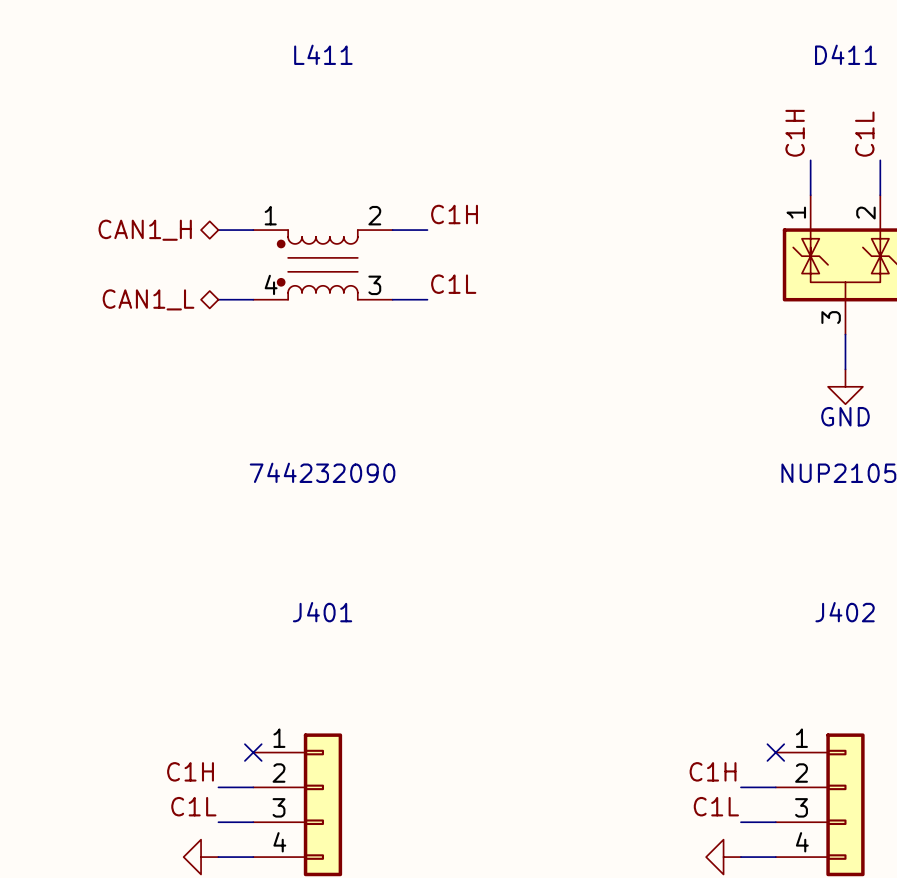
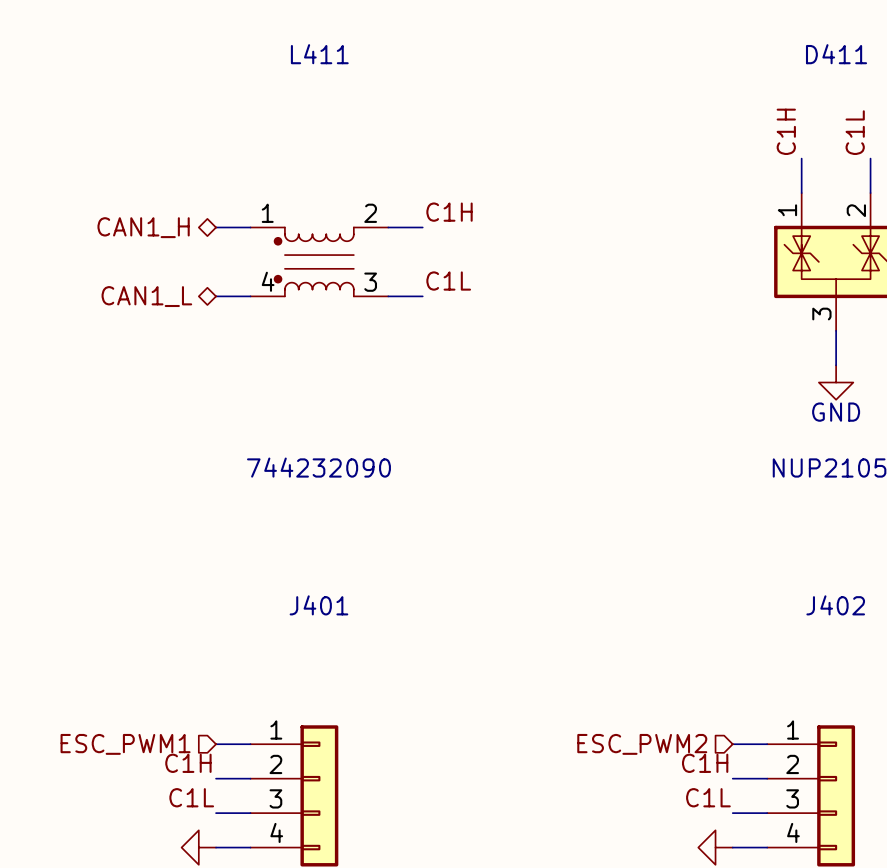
hierarchical label: none -> ESC_PWM1 (125, 744)
wire: none -> (216, 744) (250, 744)
no-connect mark: (253, 752) -> none
hierarchical label: none -> ESC_PWM2 (642, 744)
wire: none -> (732, 744) (767, 744)
no-connect mark: (775, 752) -> none

